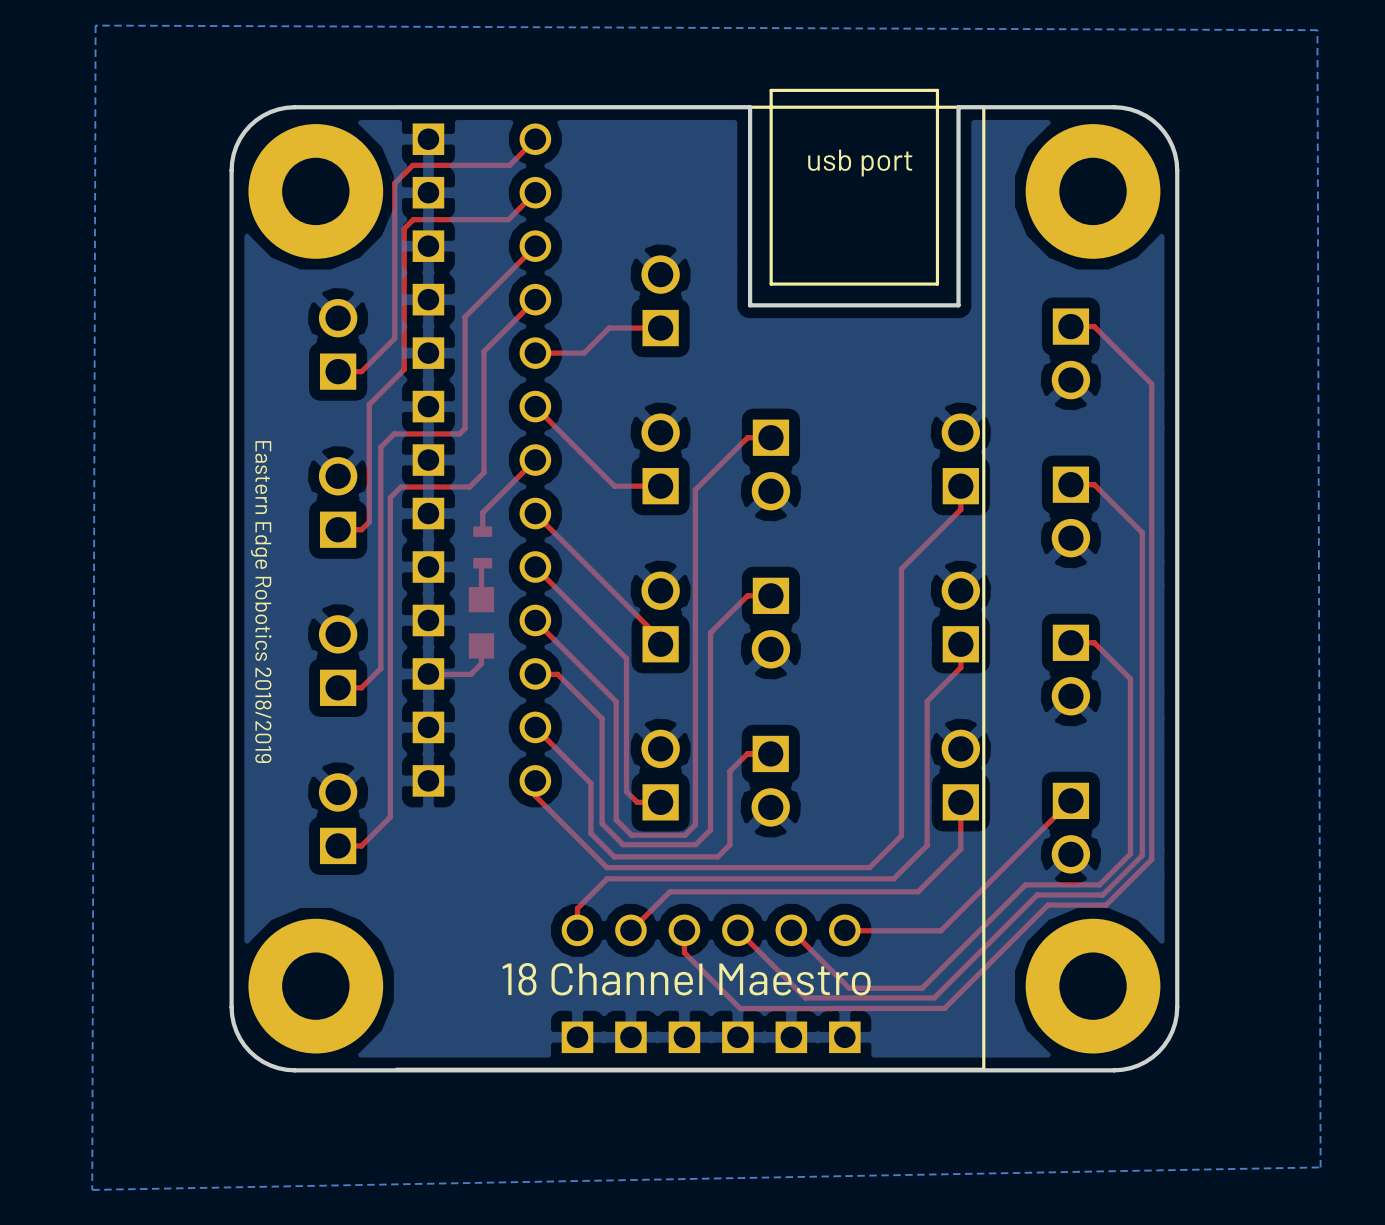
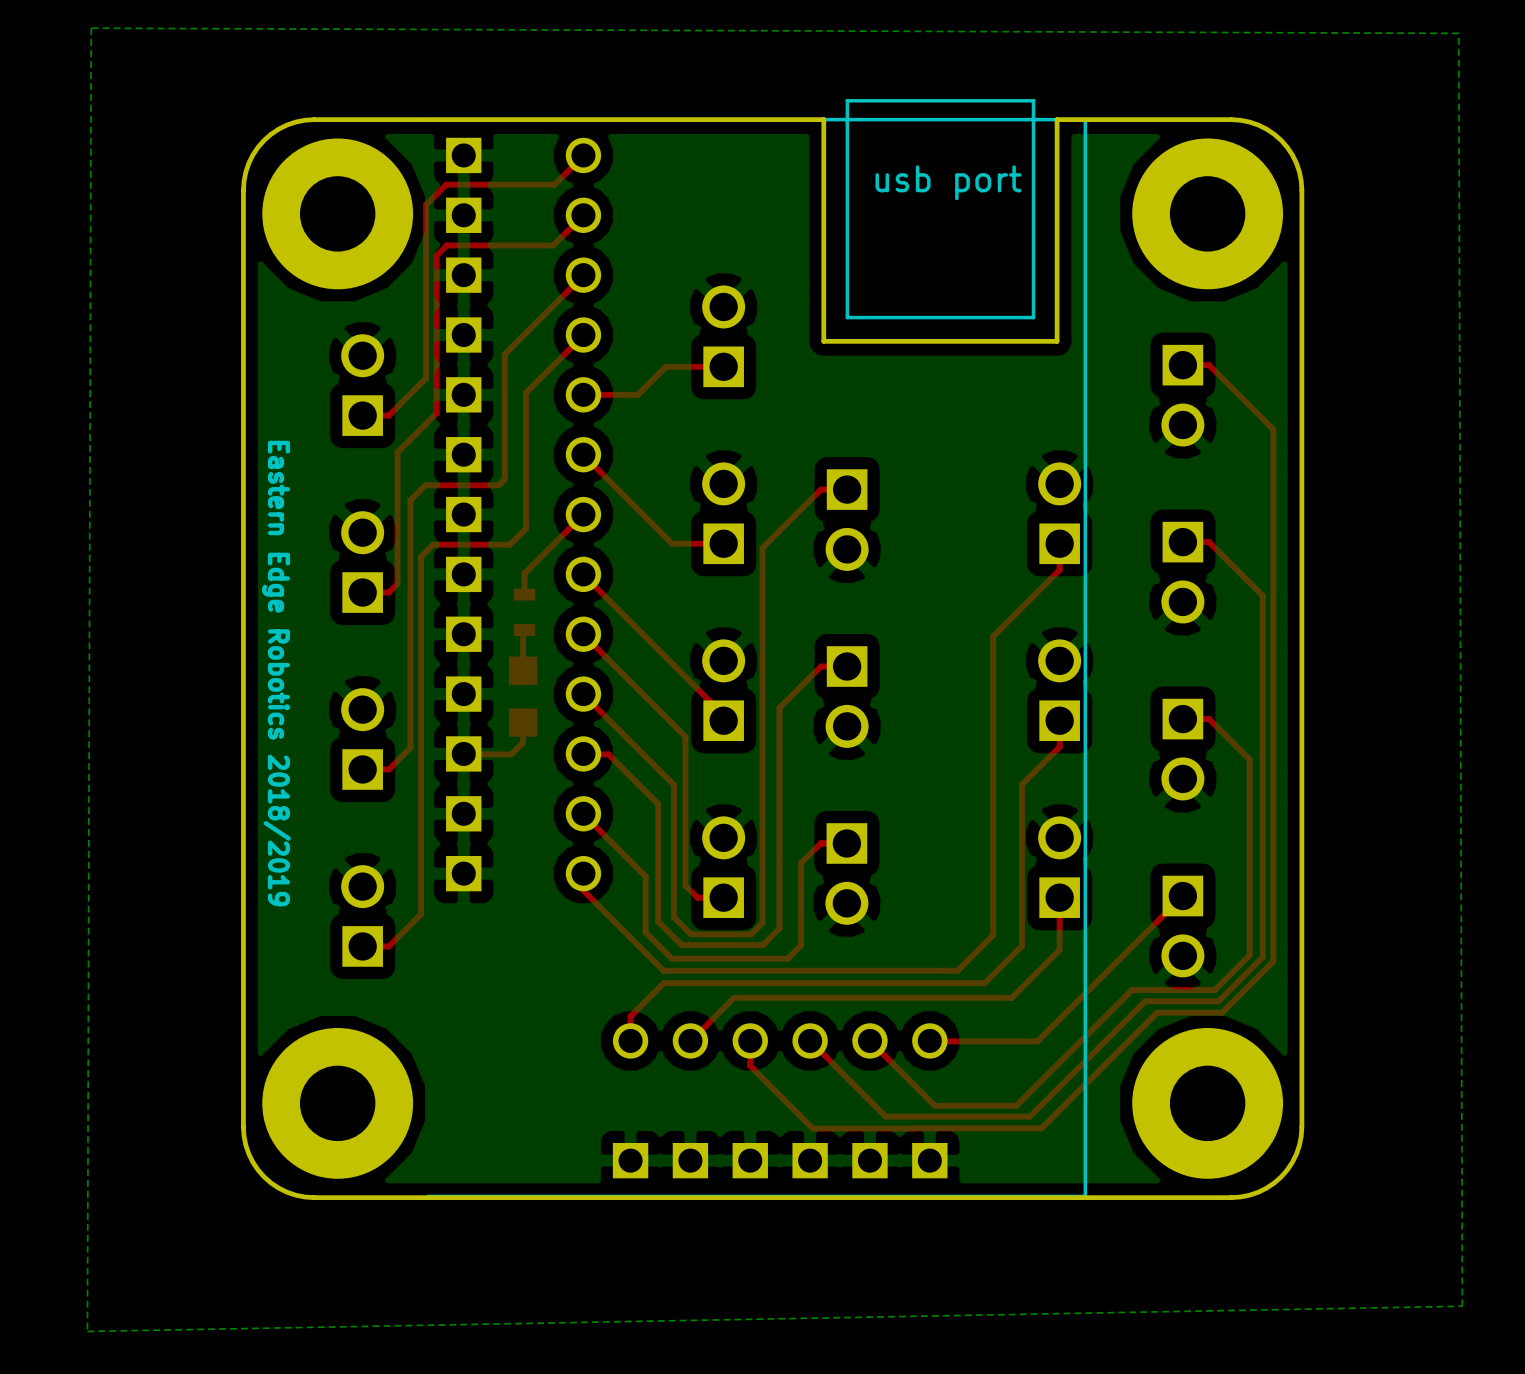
text: 18 Channel Maestro (686, 979) -> none

